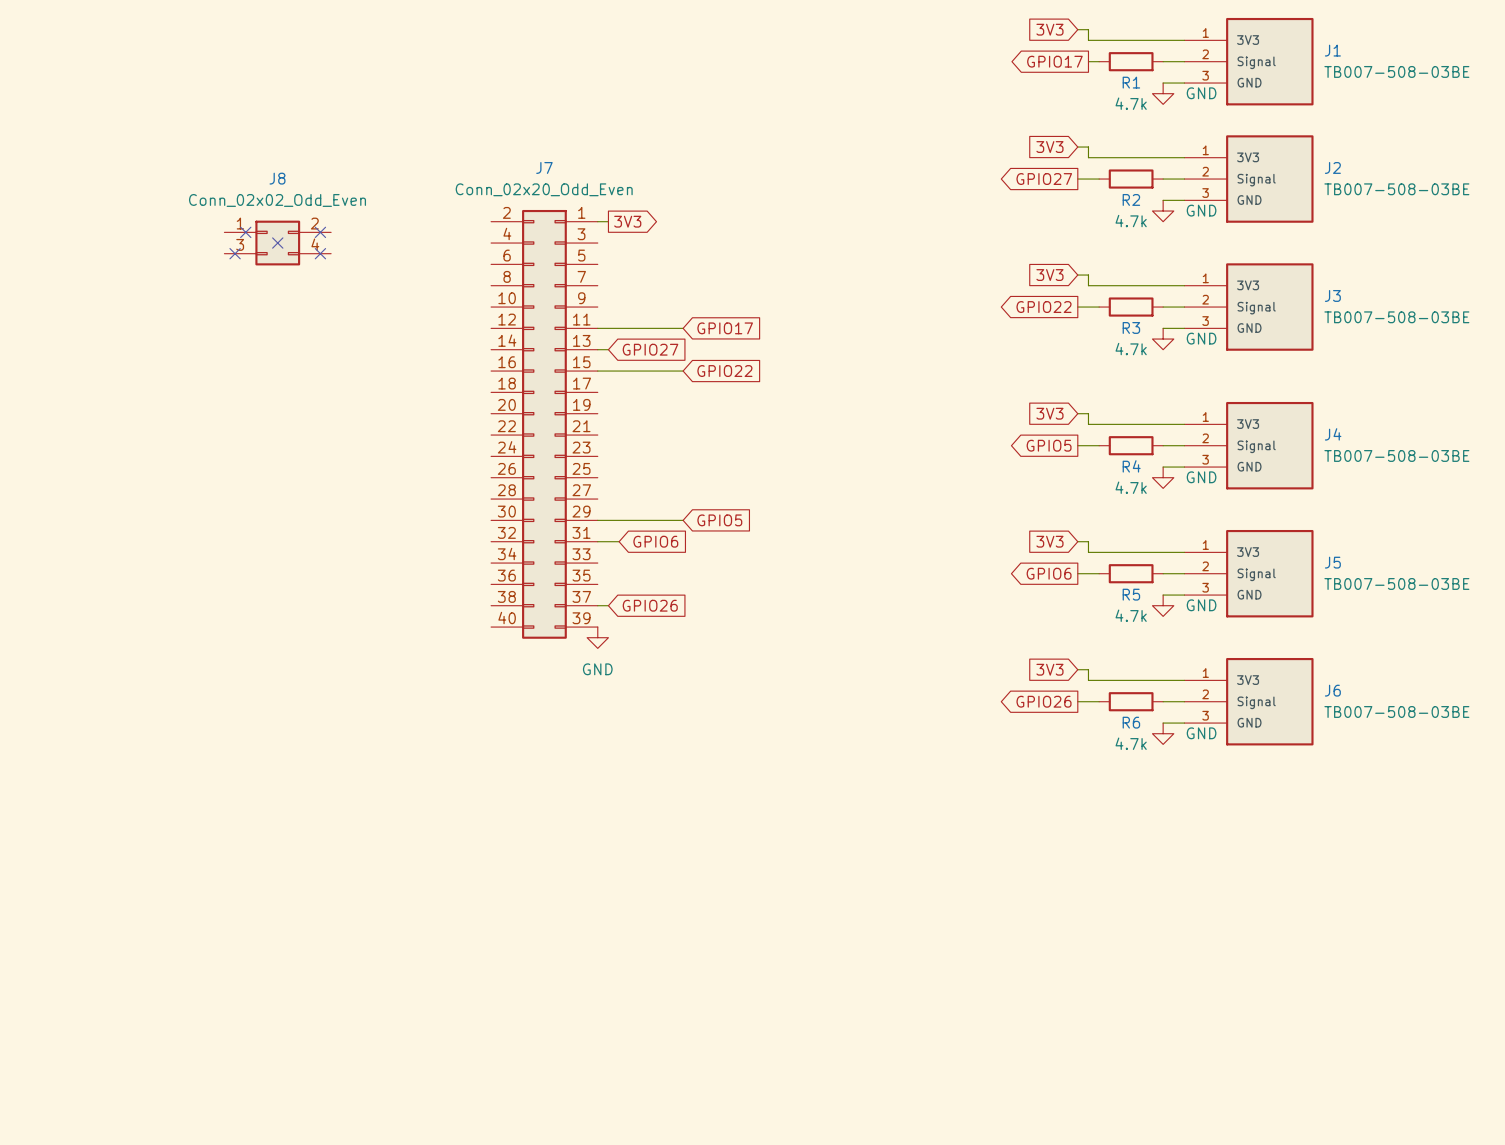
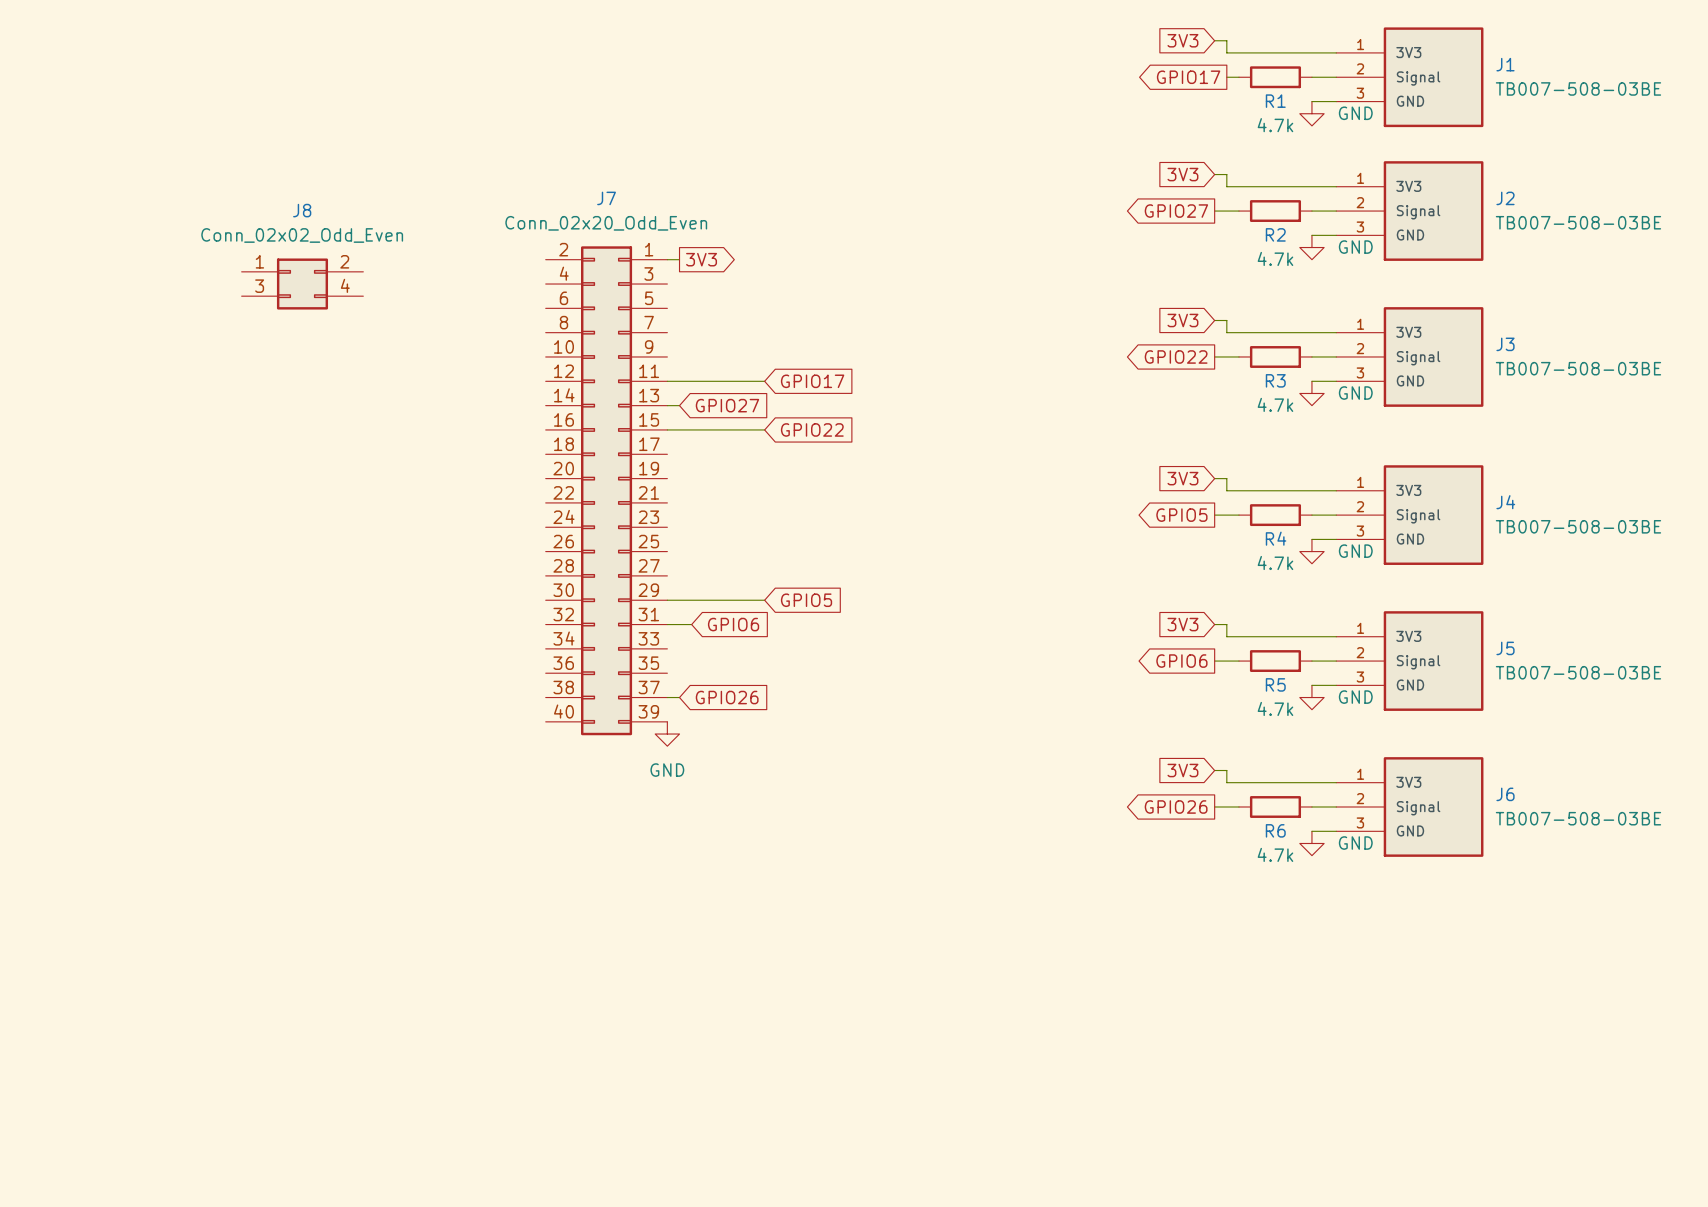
no-connect mark: (245, 232) -> none
no-connect mark: (320, 232) -> none
no-connect mark: (277, 243) -> none
no-connect mark: (235, 253) -> none
no-connect mark: (320, 253) -> none

